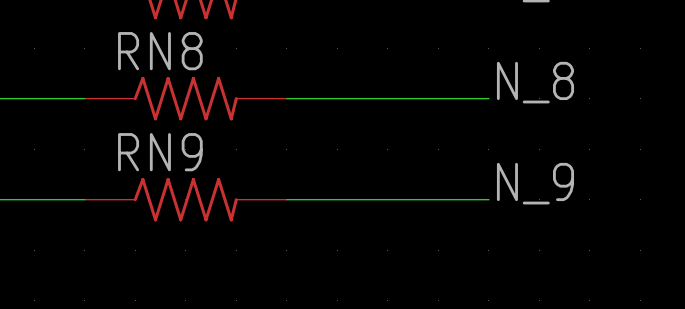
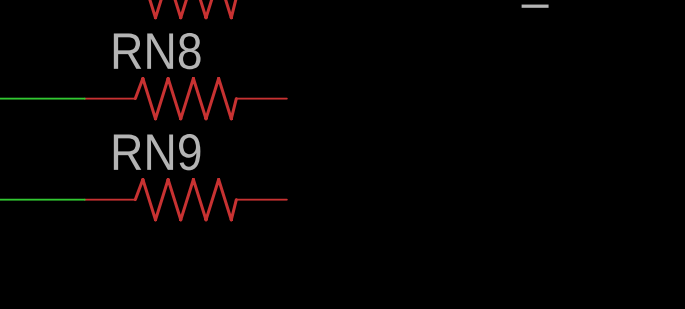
label: N_8 (535, 82) -> none
wire: (286, 98) (488, 98) -> none
label: N_9 (535, 183) -> none
wire: (286, 199) (488, 199) -> none

